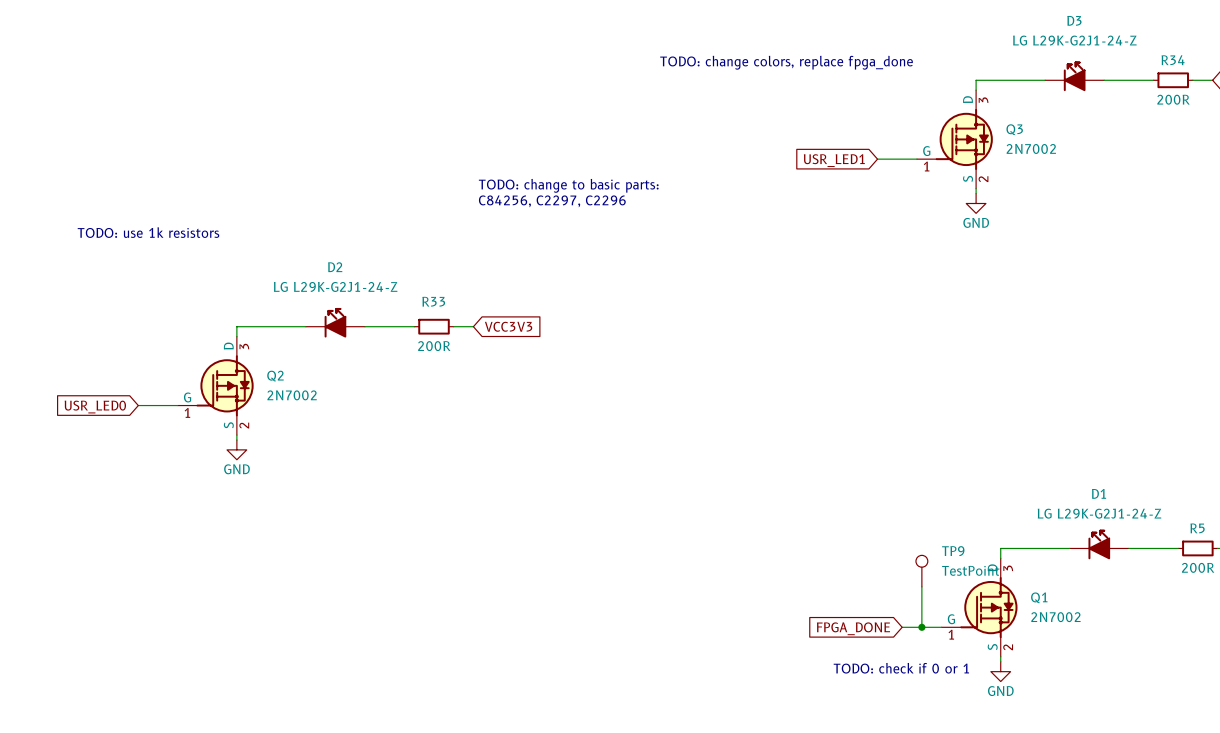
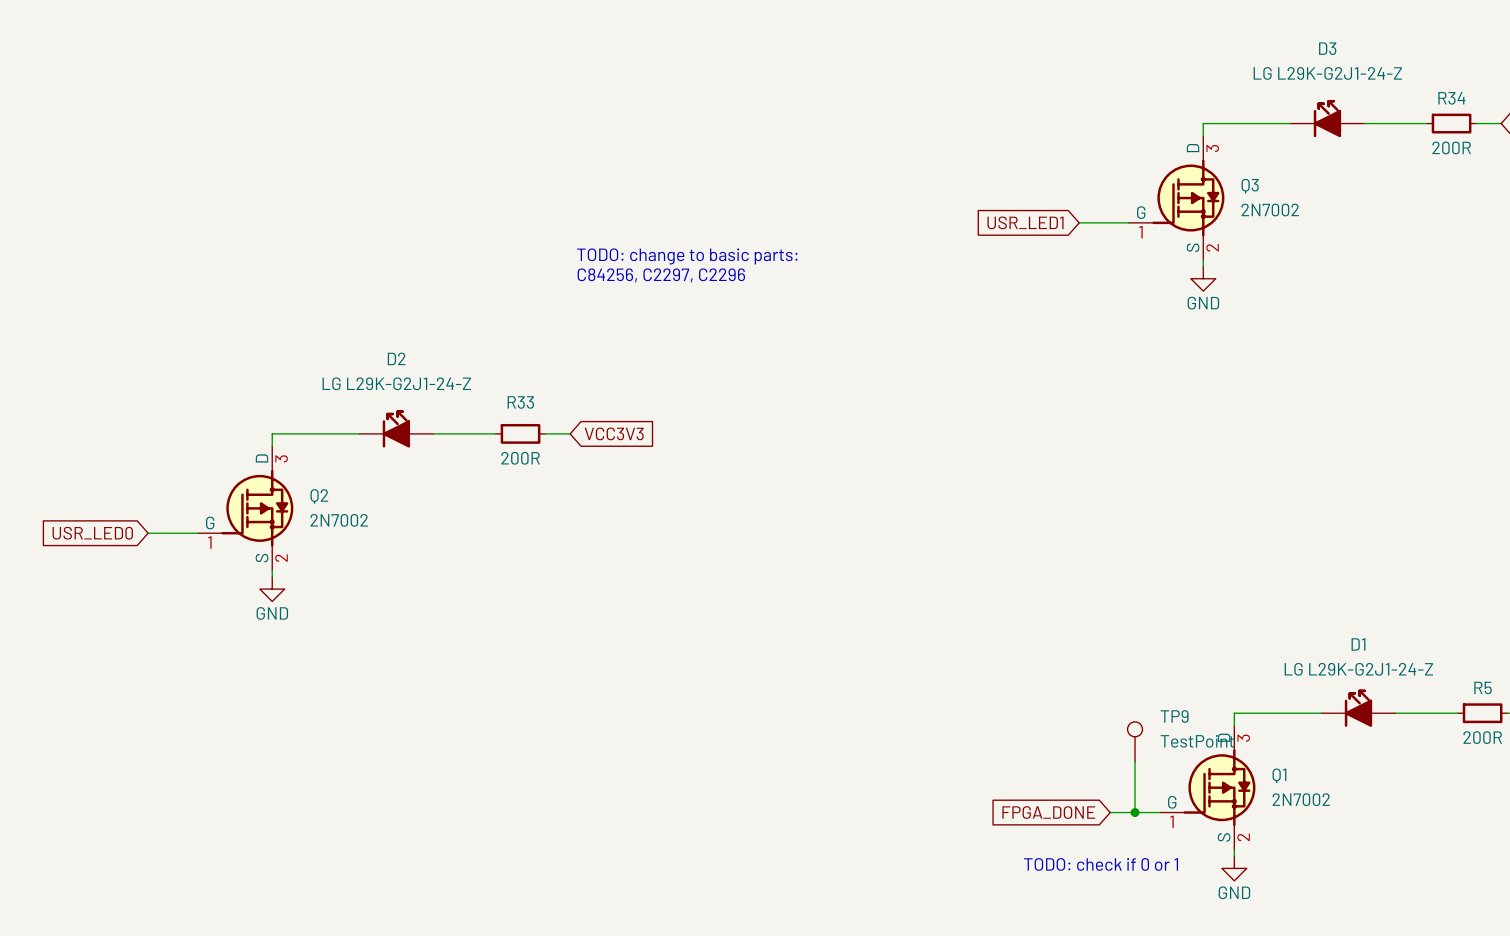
text: TODO: change colors, replace fpga_done (786, 62) -> none
text: TODO: use 1k resistors (148, 232) -> none

